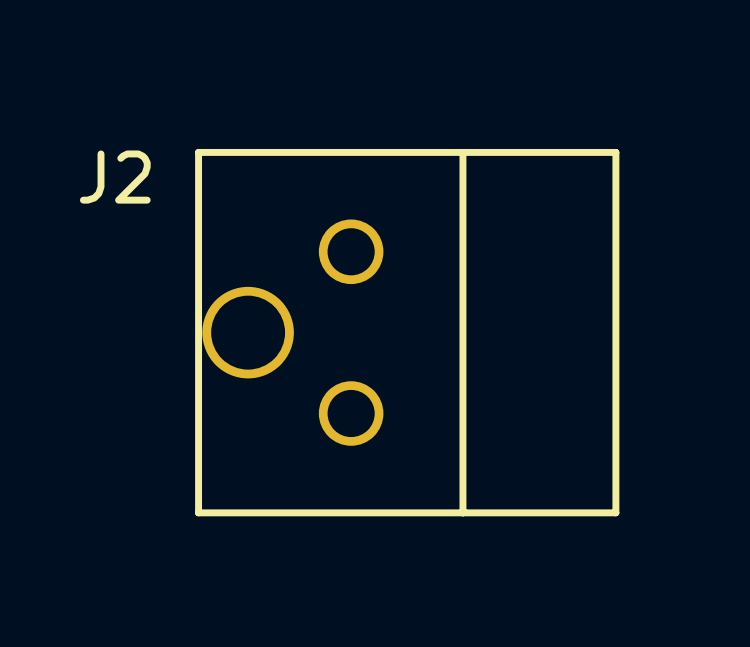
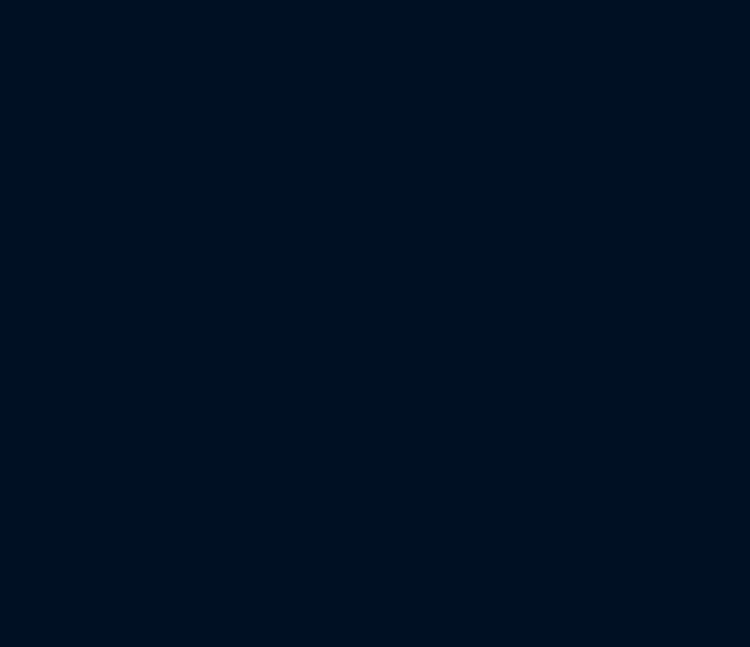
J2: (407, 332) -> none

